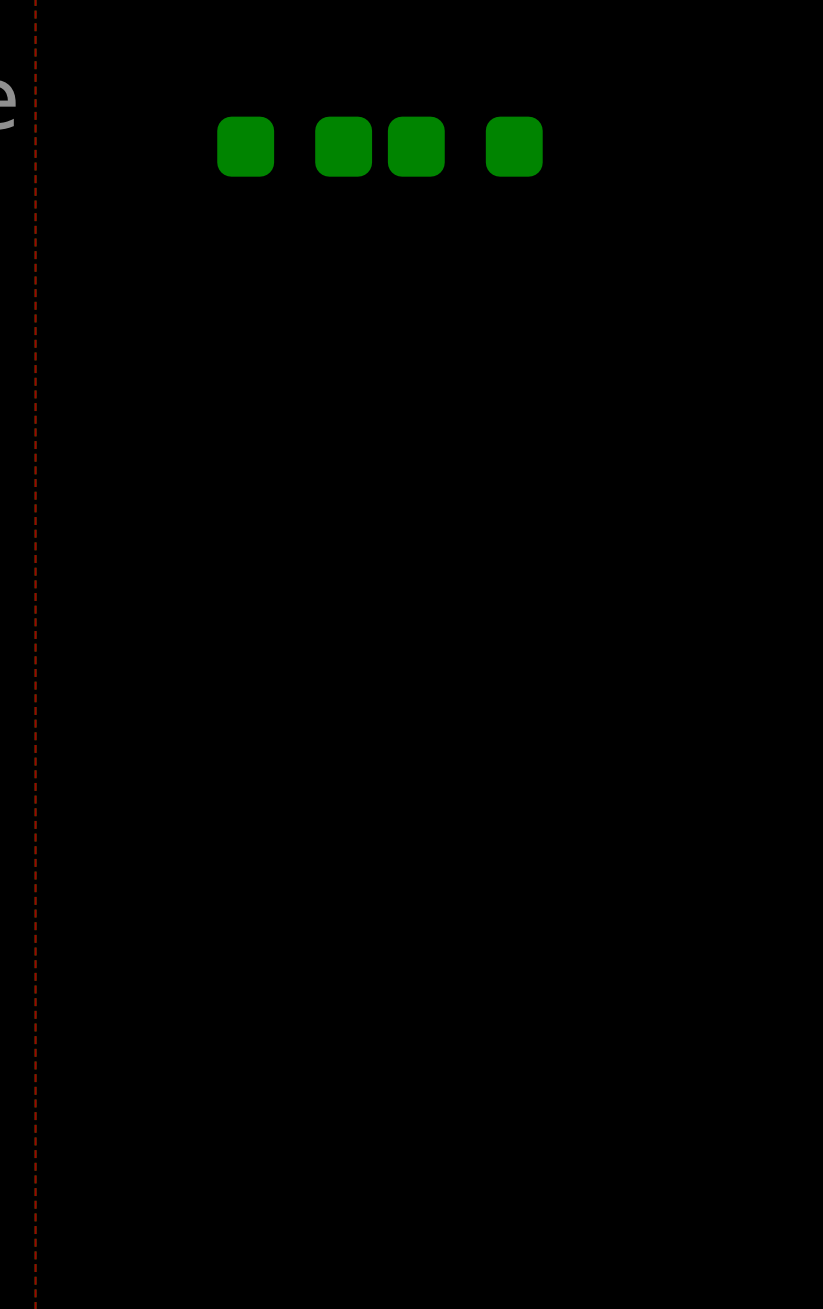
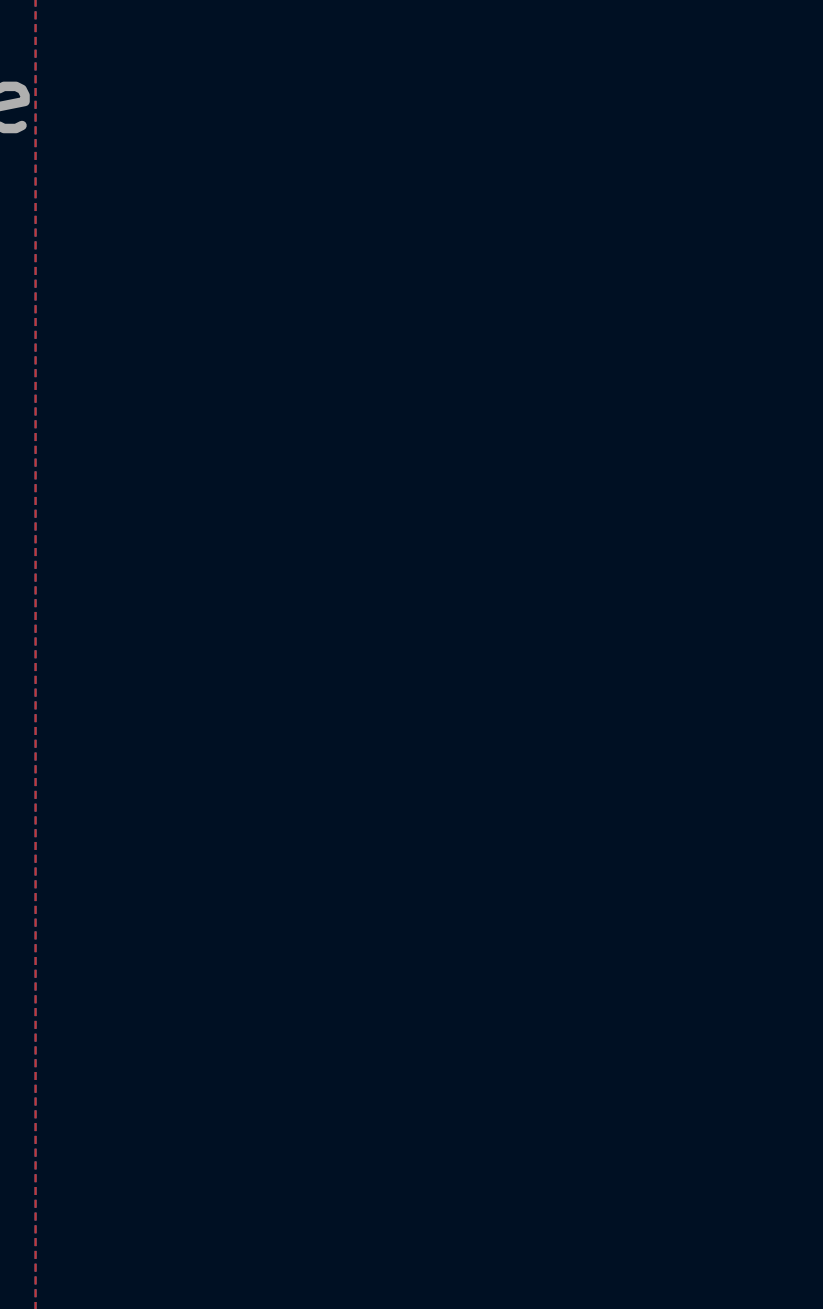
part: (294, 146) -> none
part: (465, 146) -> none

